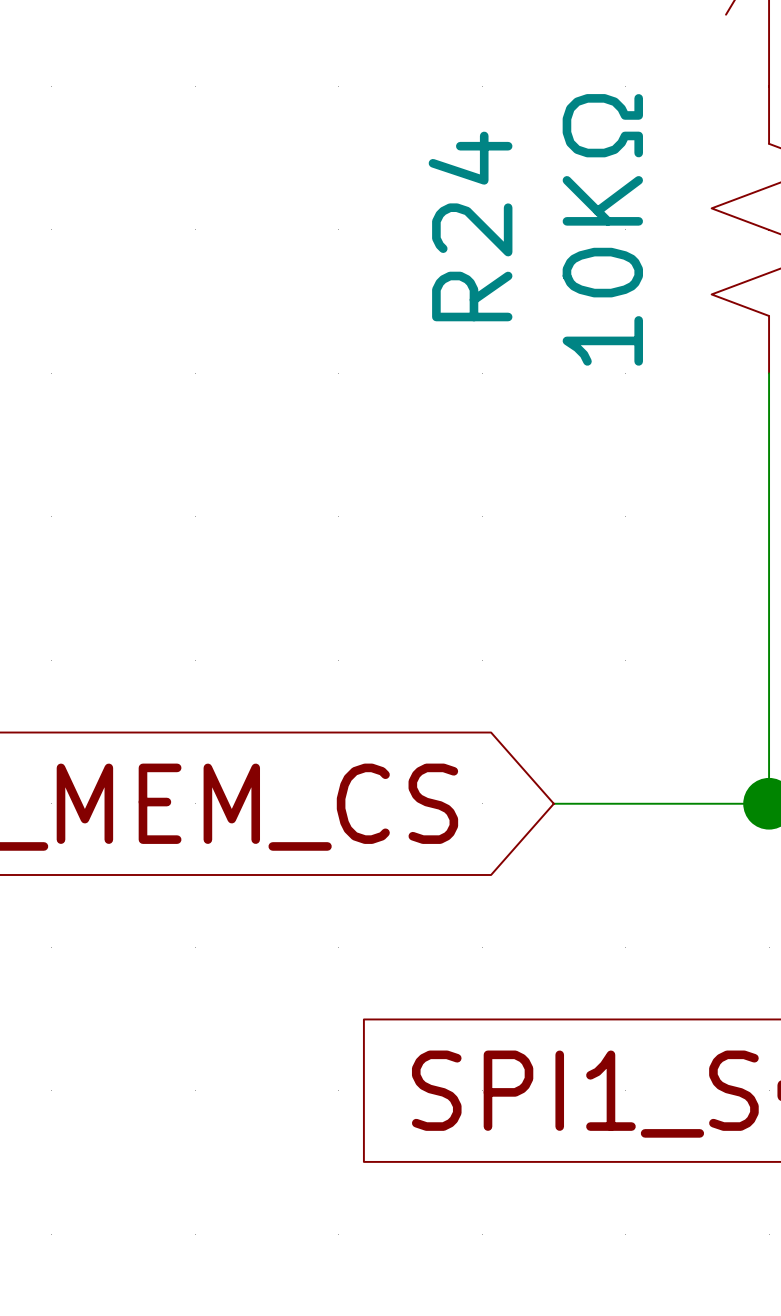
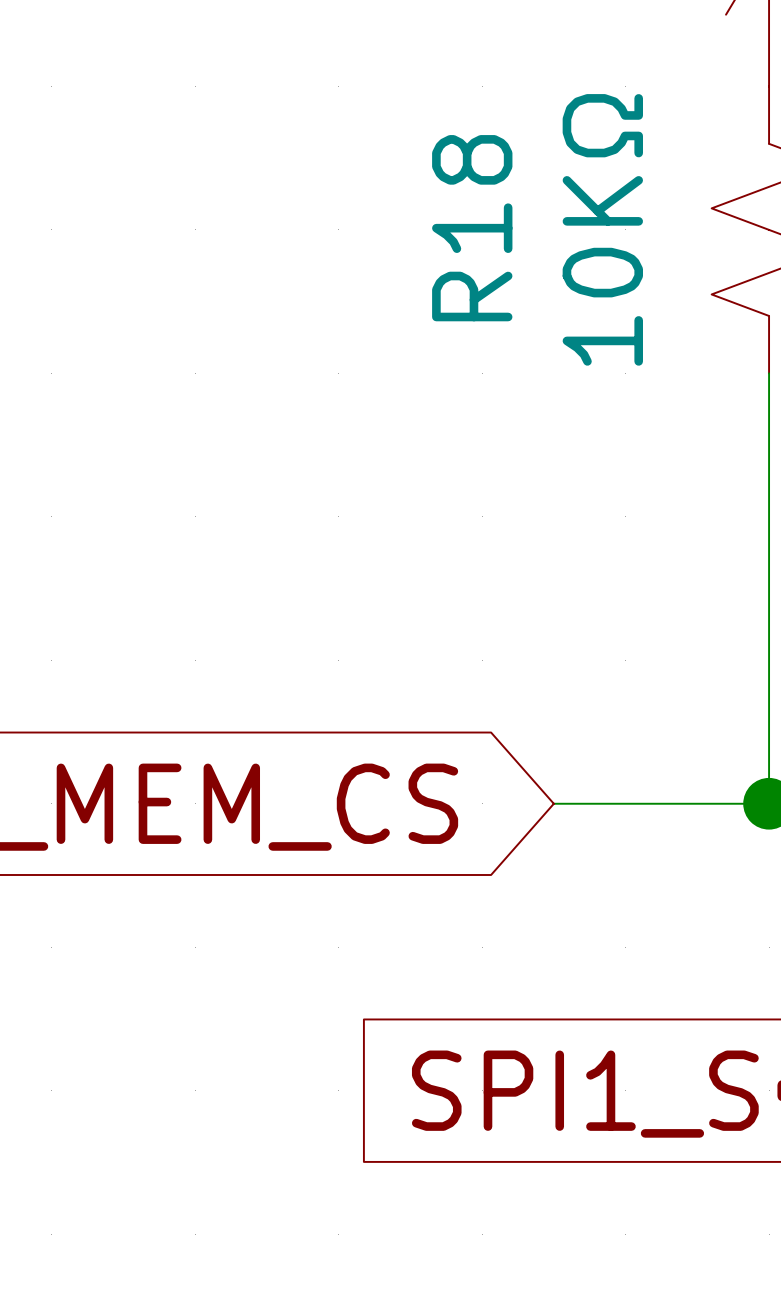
R24 name: R24 (470, 226) -> R18 (472, 228)

